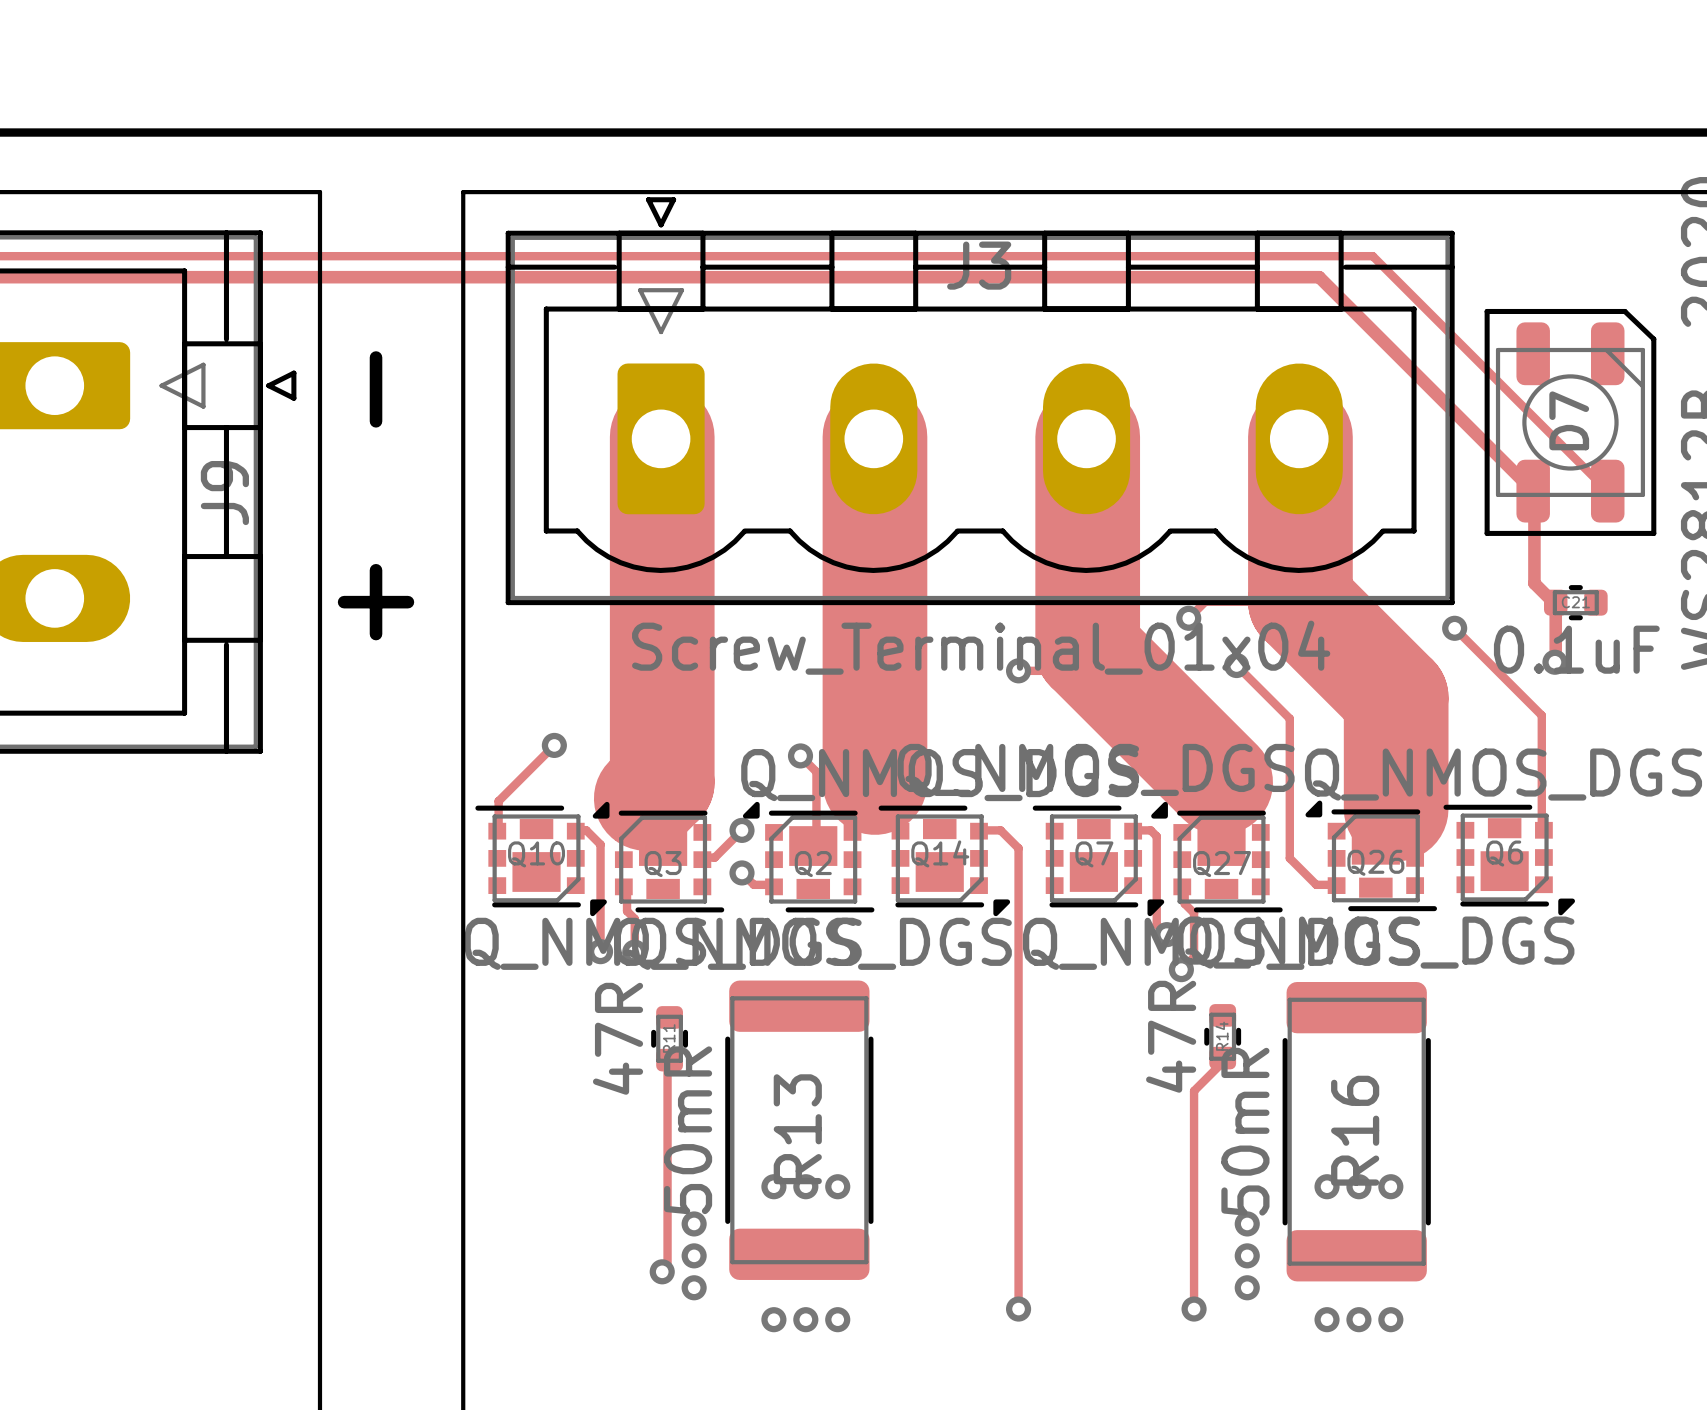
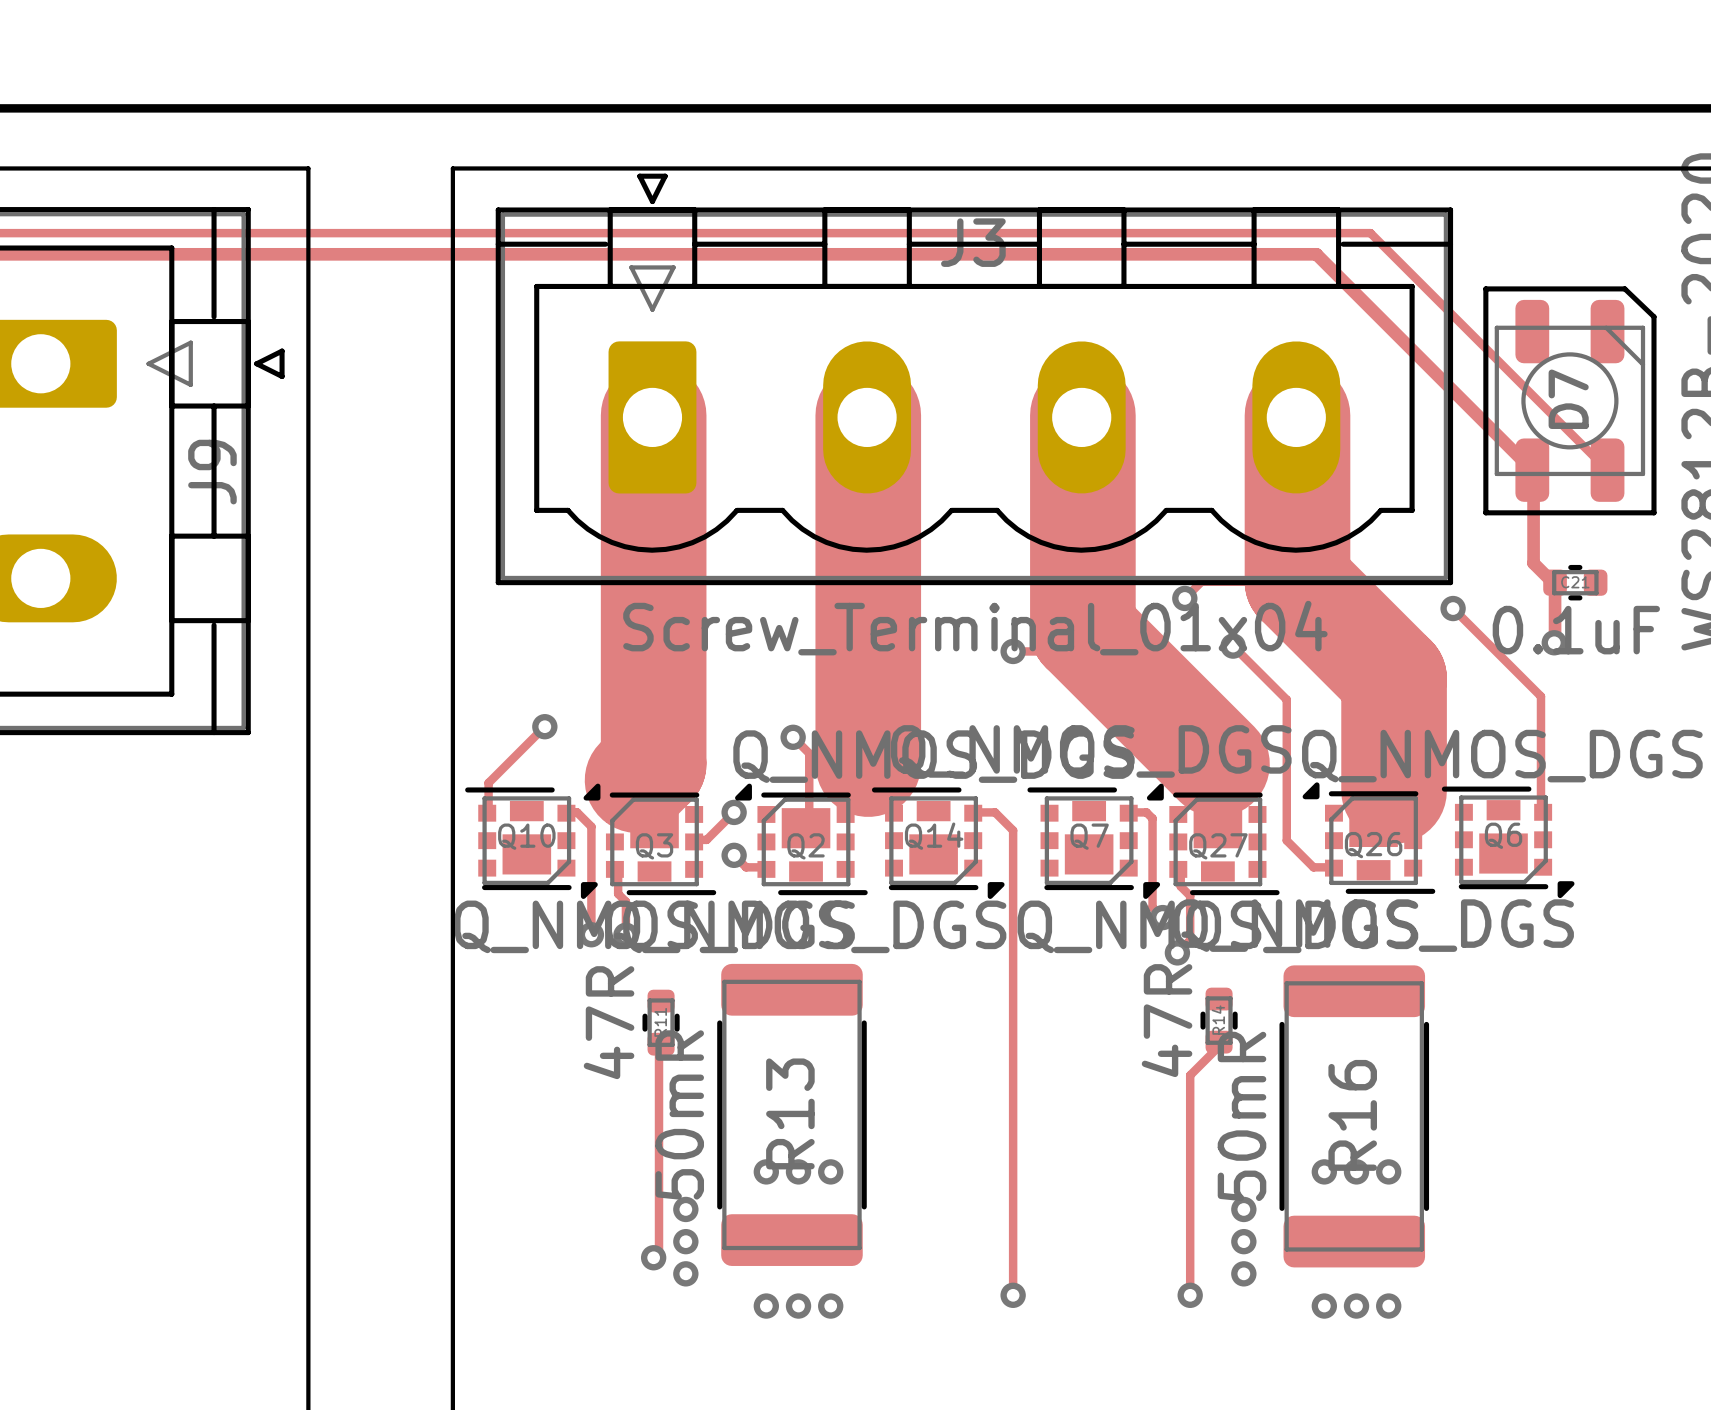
text: - (376, 389) -> none
text: + (376, 602) -> none

